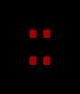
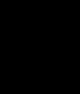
part: (39, 33) -> none
part: (39, 60) -> none

